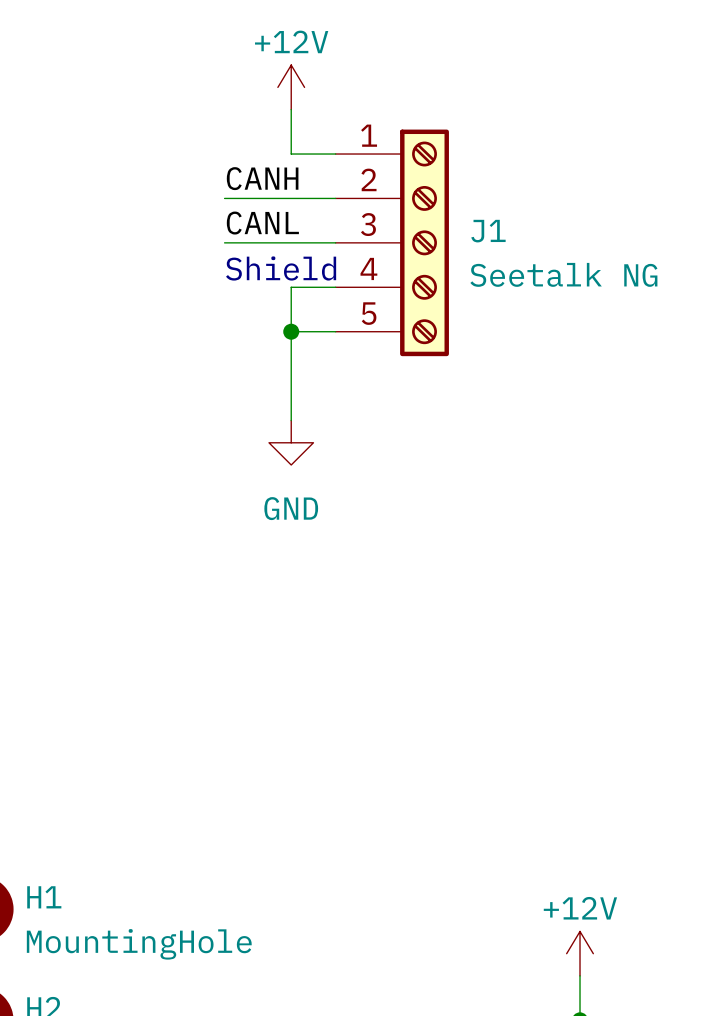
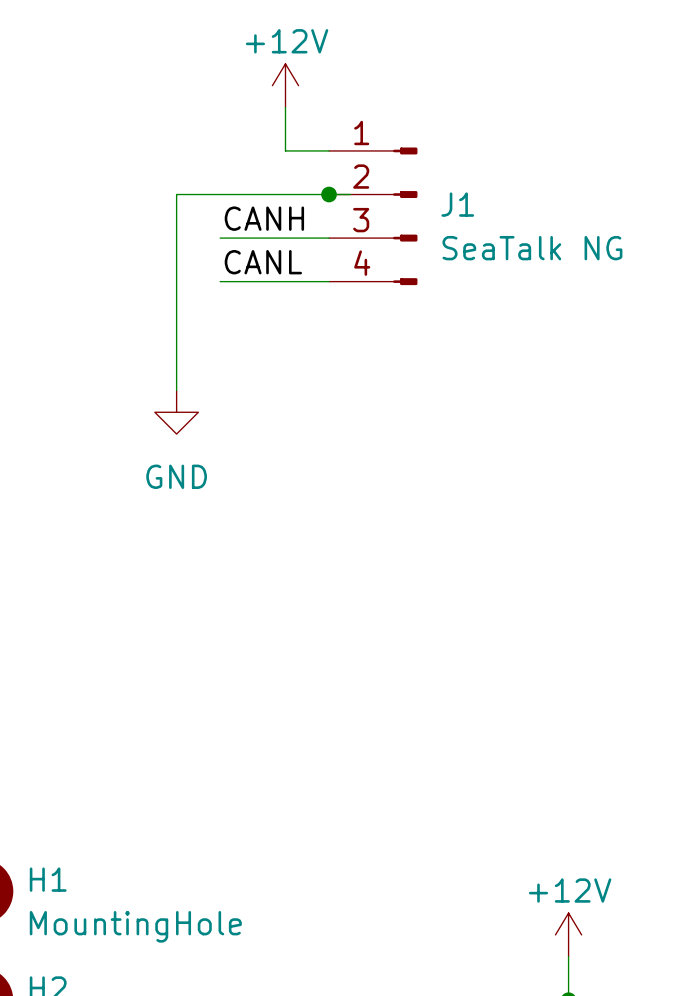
J1 symbol: [335, 129, 449, 357] -> [329, 147, 418, 286]
label: CANH (262, 178) -> none
wire: none -> (220, 194) (176, 194) (176, 390)
junction: none -> (329, 194)
label: CANL (262, 223) -> CANH (264, 218)
label: none -> CANL (263, 262)
text: Shield (281, 268) -> none
J1 value: Seetalk NG (563, 274) -> SeaTalk NG (532, 248)
wire: (291, 287) (291, 420) -> (285, 281) (220, 281)
wire: (291, 331) (335, 331) -> none
junction: (291, 331) -> none
power symbol position: GND (291, 442) -> GND (176, 412)

